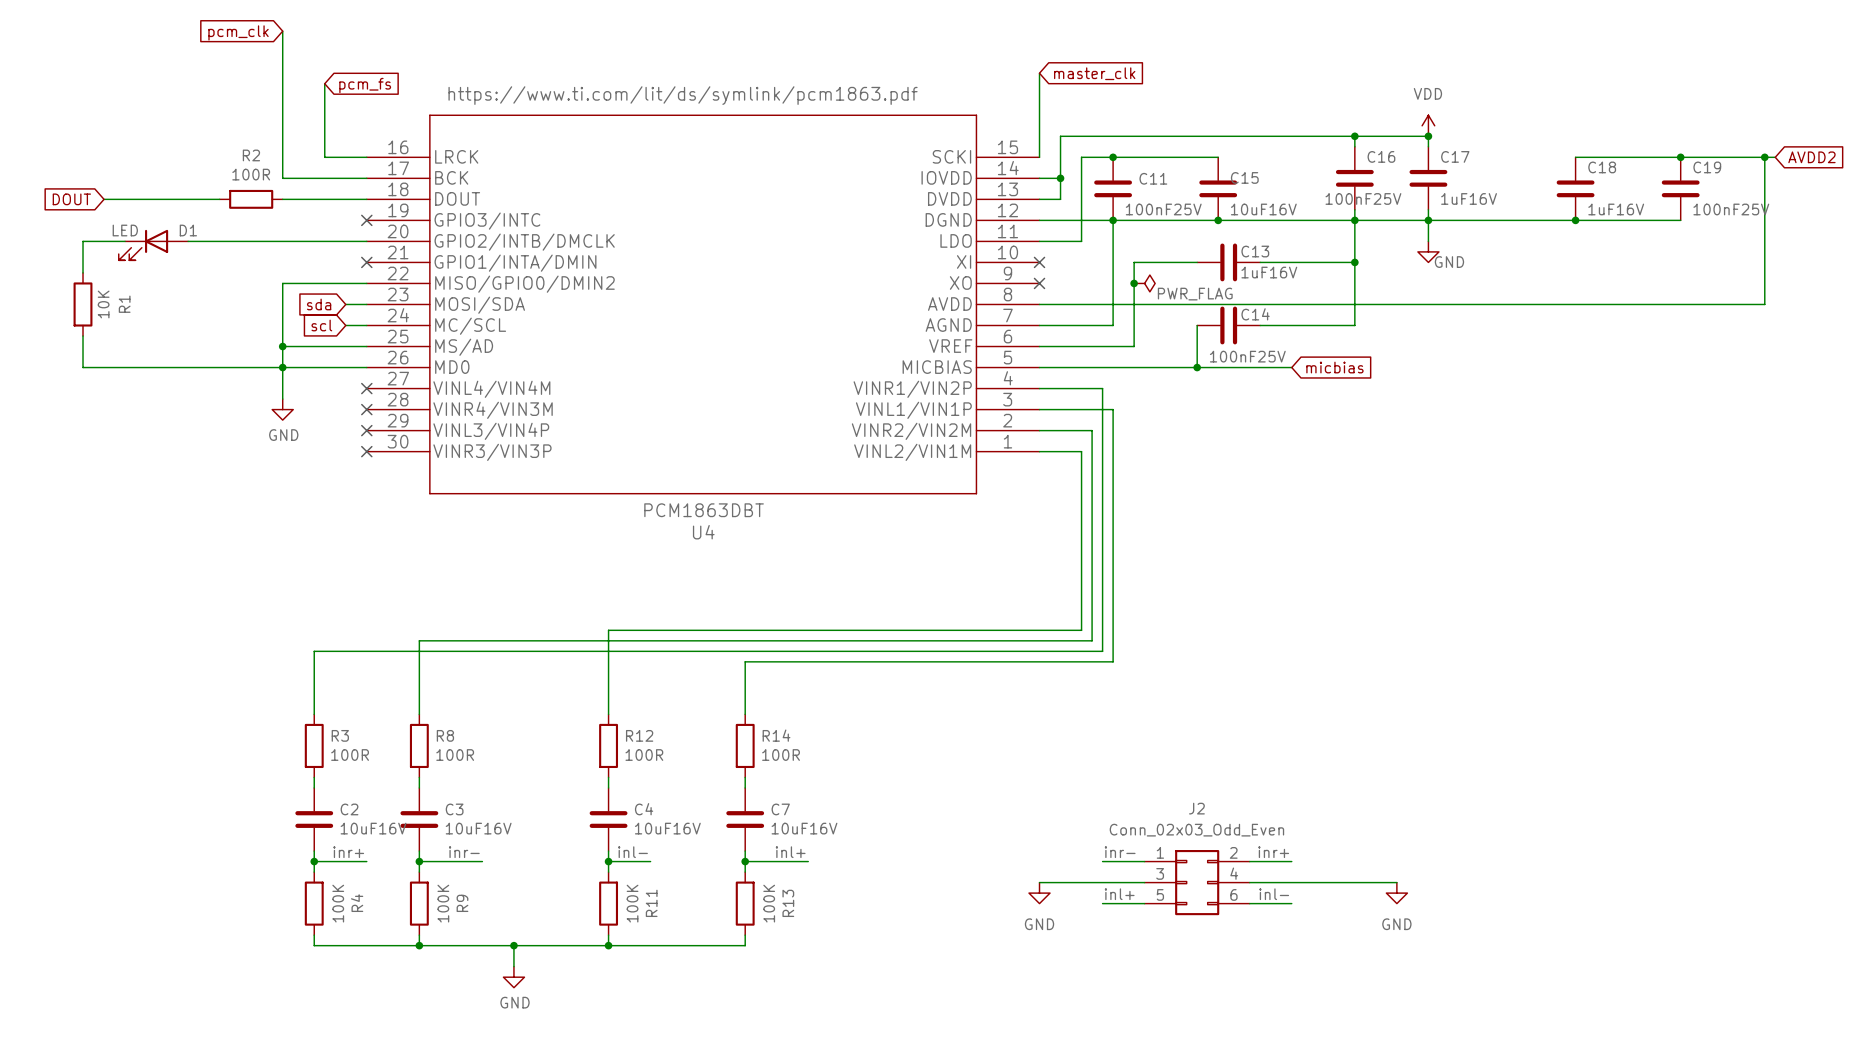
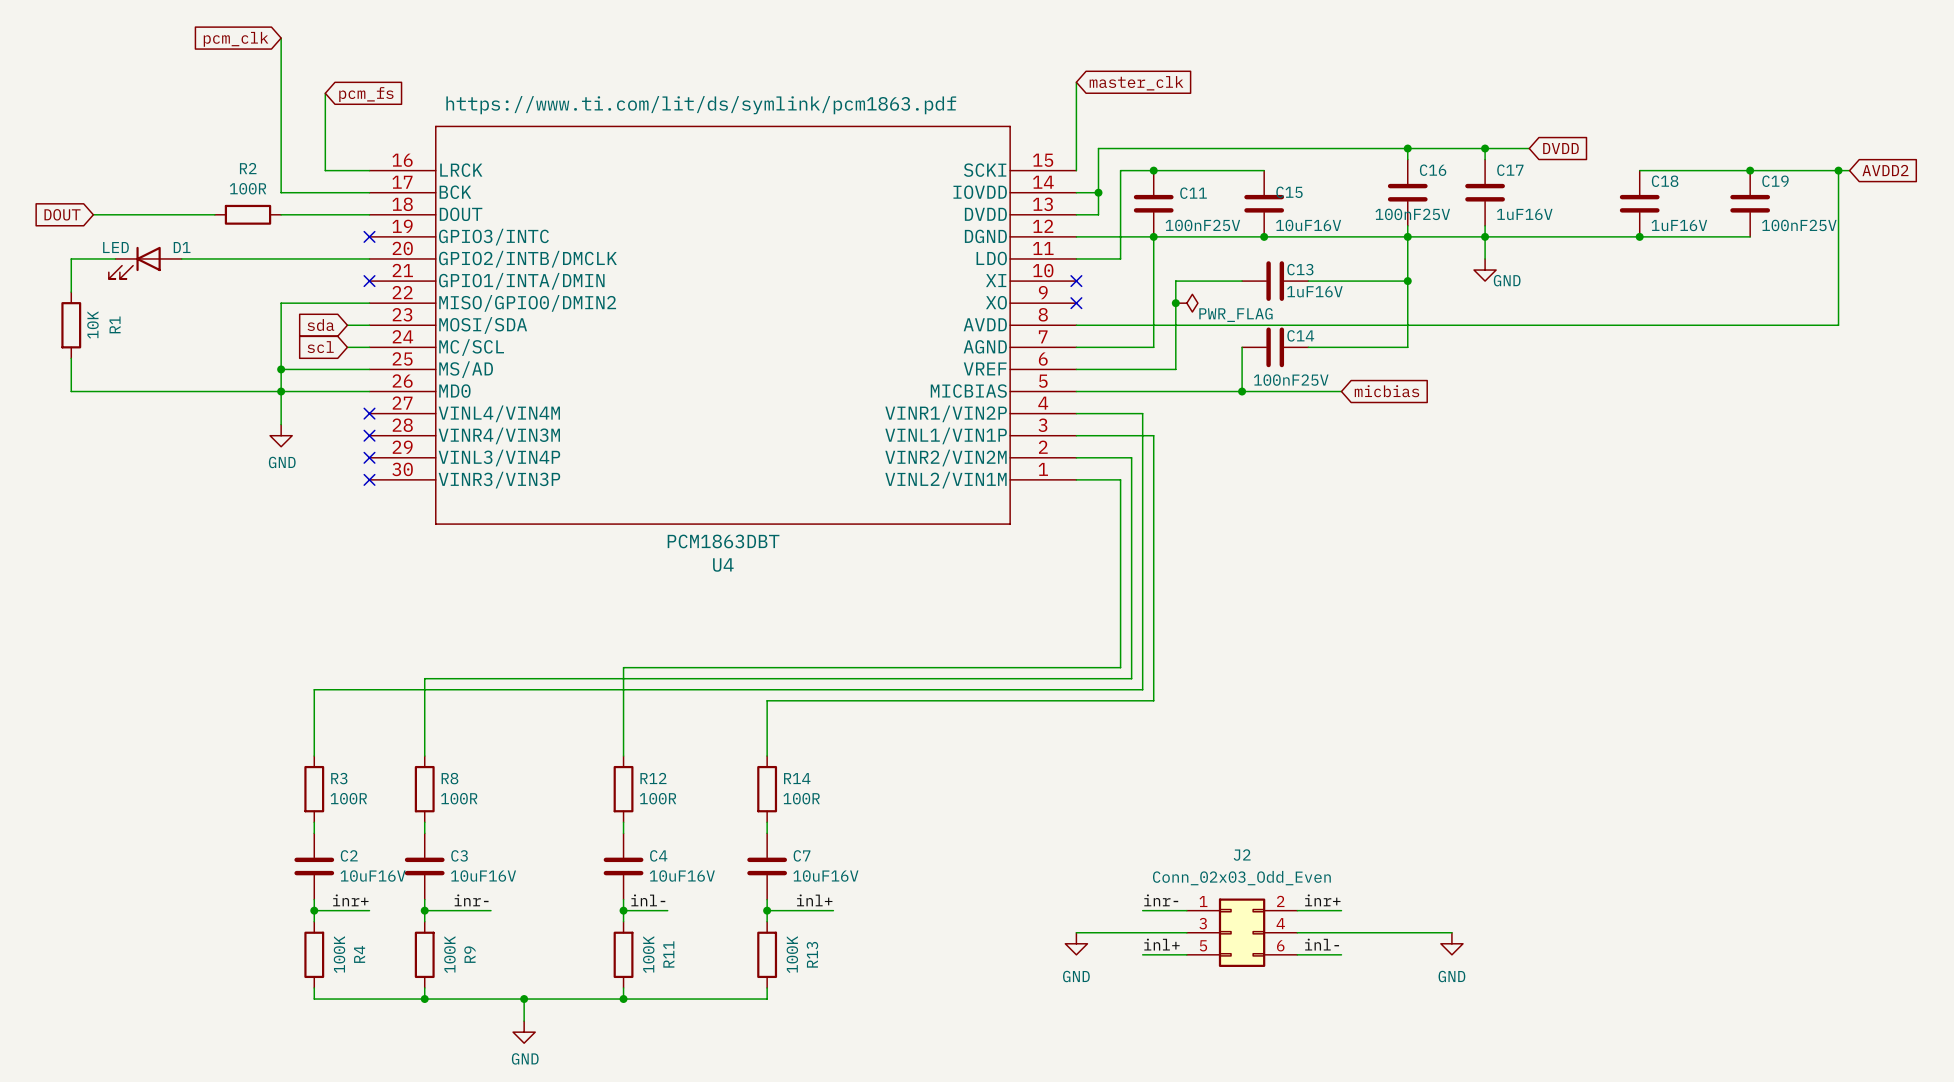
power symbol: VDD (1428, 125) -> none
wire: none -> (1485, 148) (1529, 148)
global label: none -> DVDD (1560, 148)

